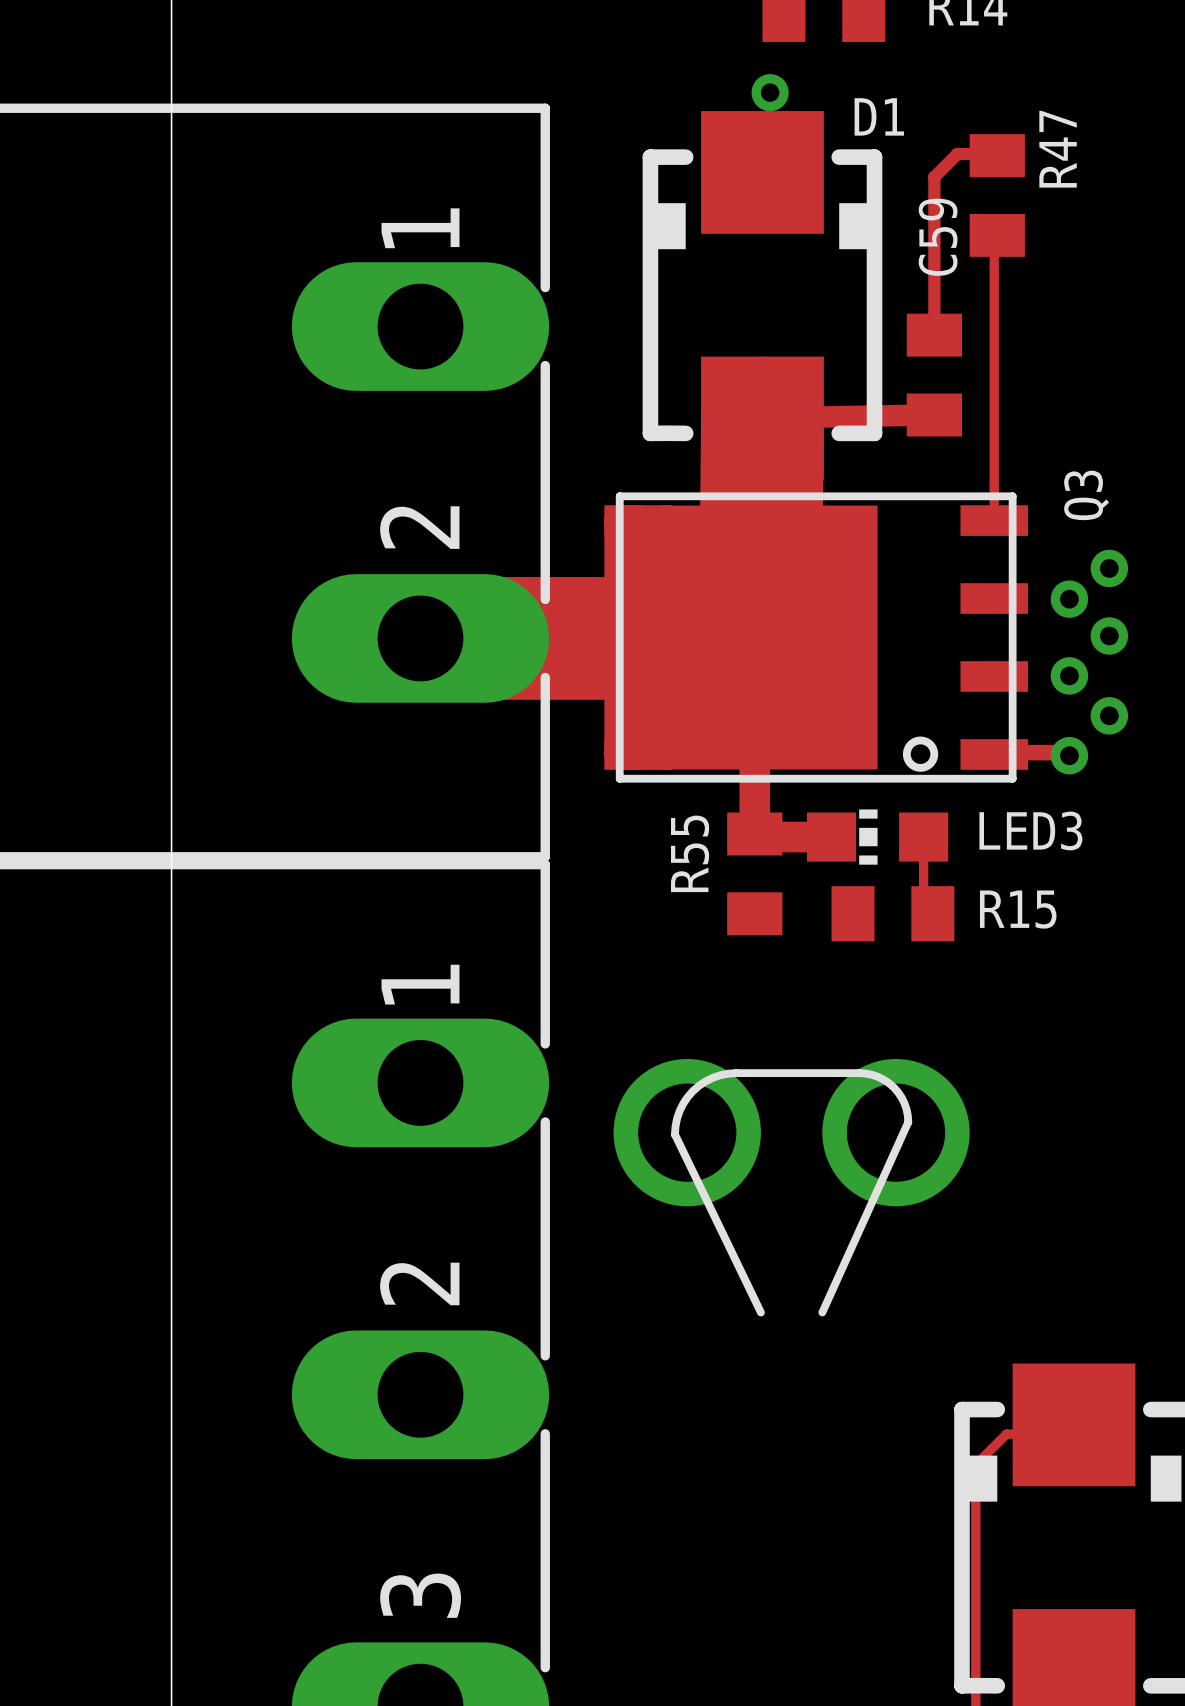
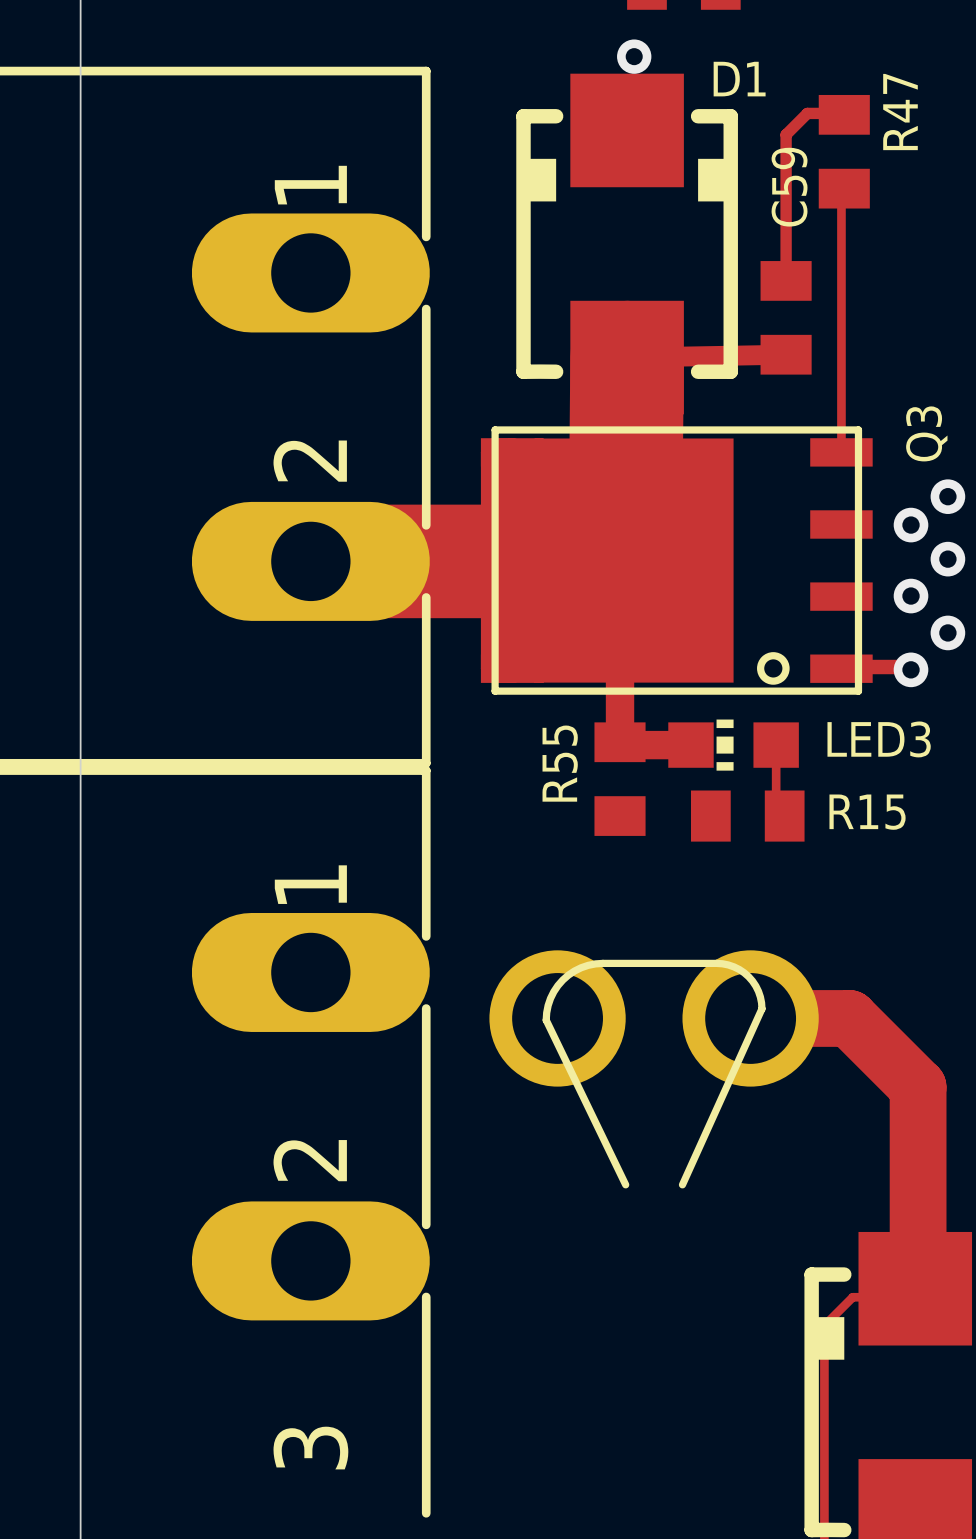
top track: none -> (750, 1018) (849, 1018) (918, 1087) (918, 1285) (915, 1288)

